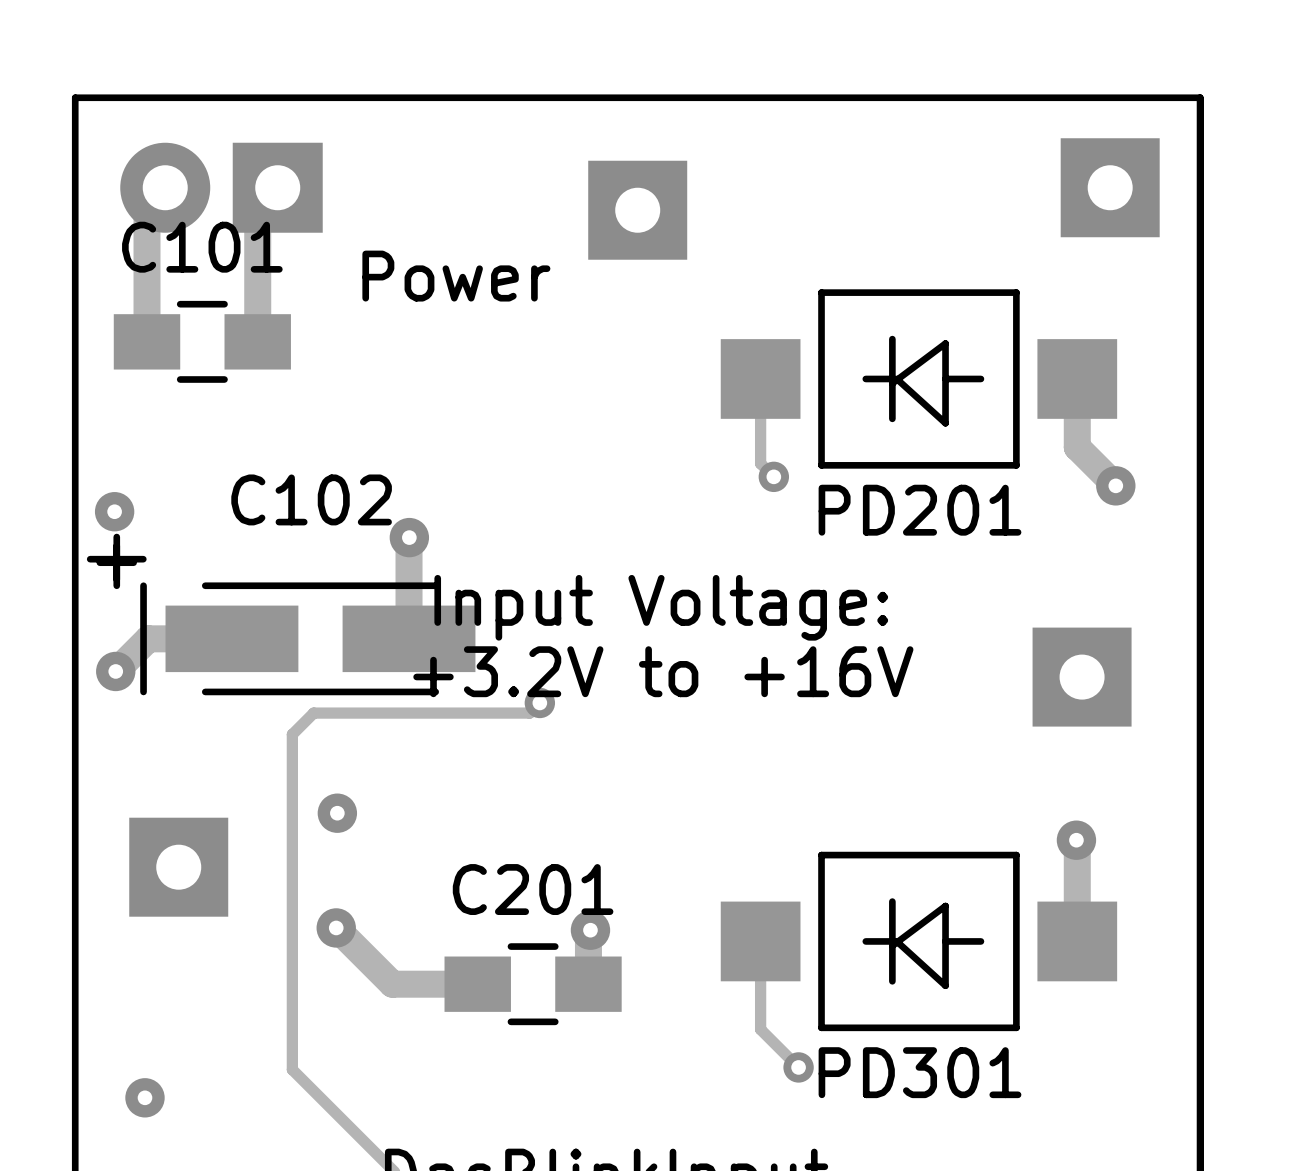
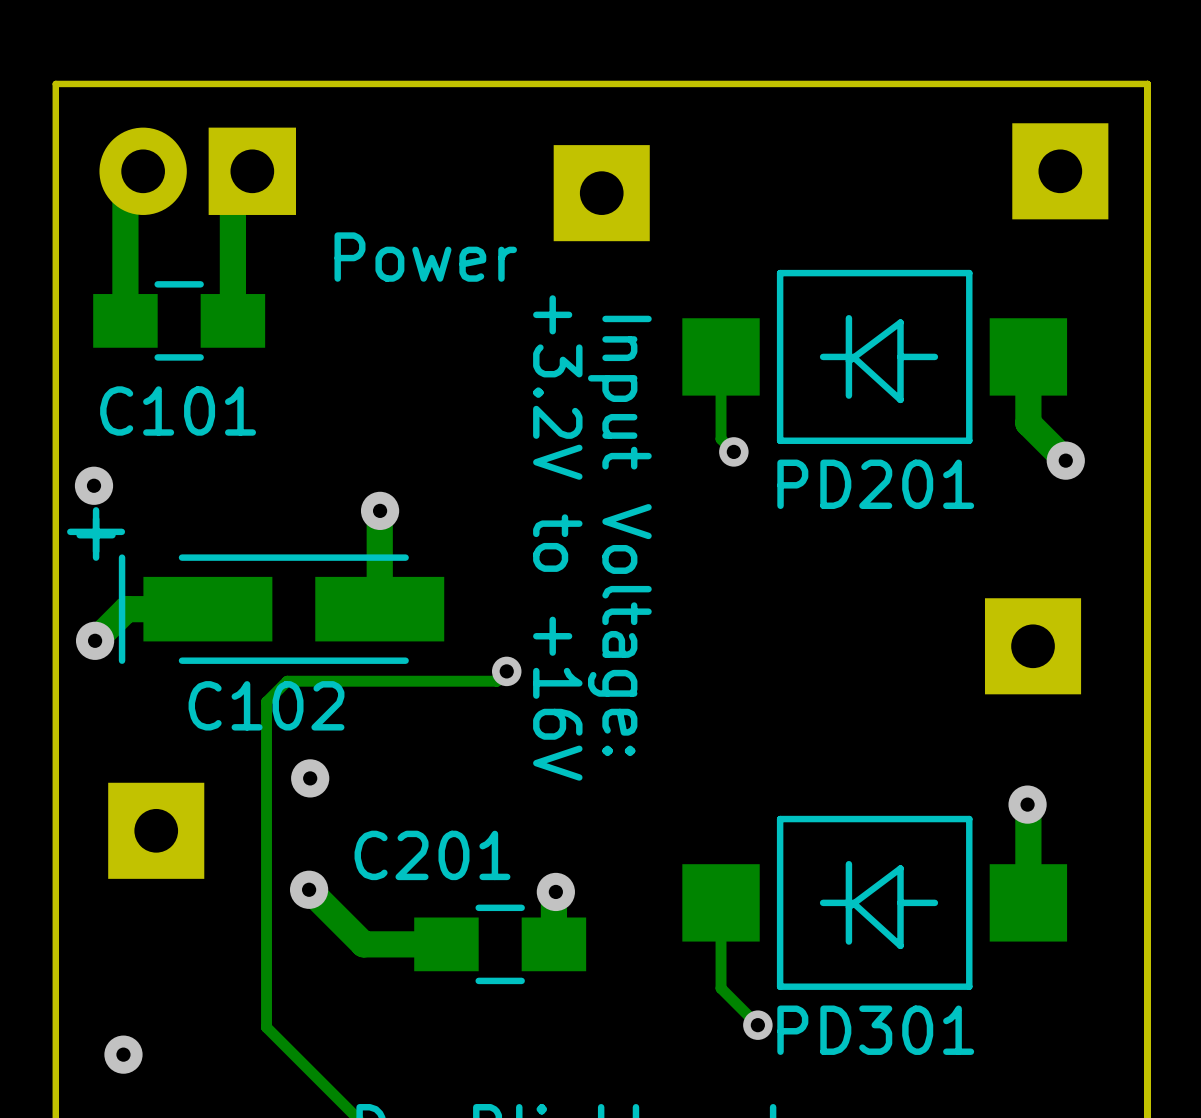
C101 name position: C101 (202, 247) -> C101 (178, 411)
C102 name position: C102 (311, 499) -> C102 (266, 705)
text rotation: 0° (661, 607) -> 90° clockwise (619, 535)
text rotation: 0° (663, 671) -> 90° clockwise (557, 537)
C201 name position: C201 (533, 889) -> C201 (432, 855)

